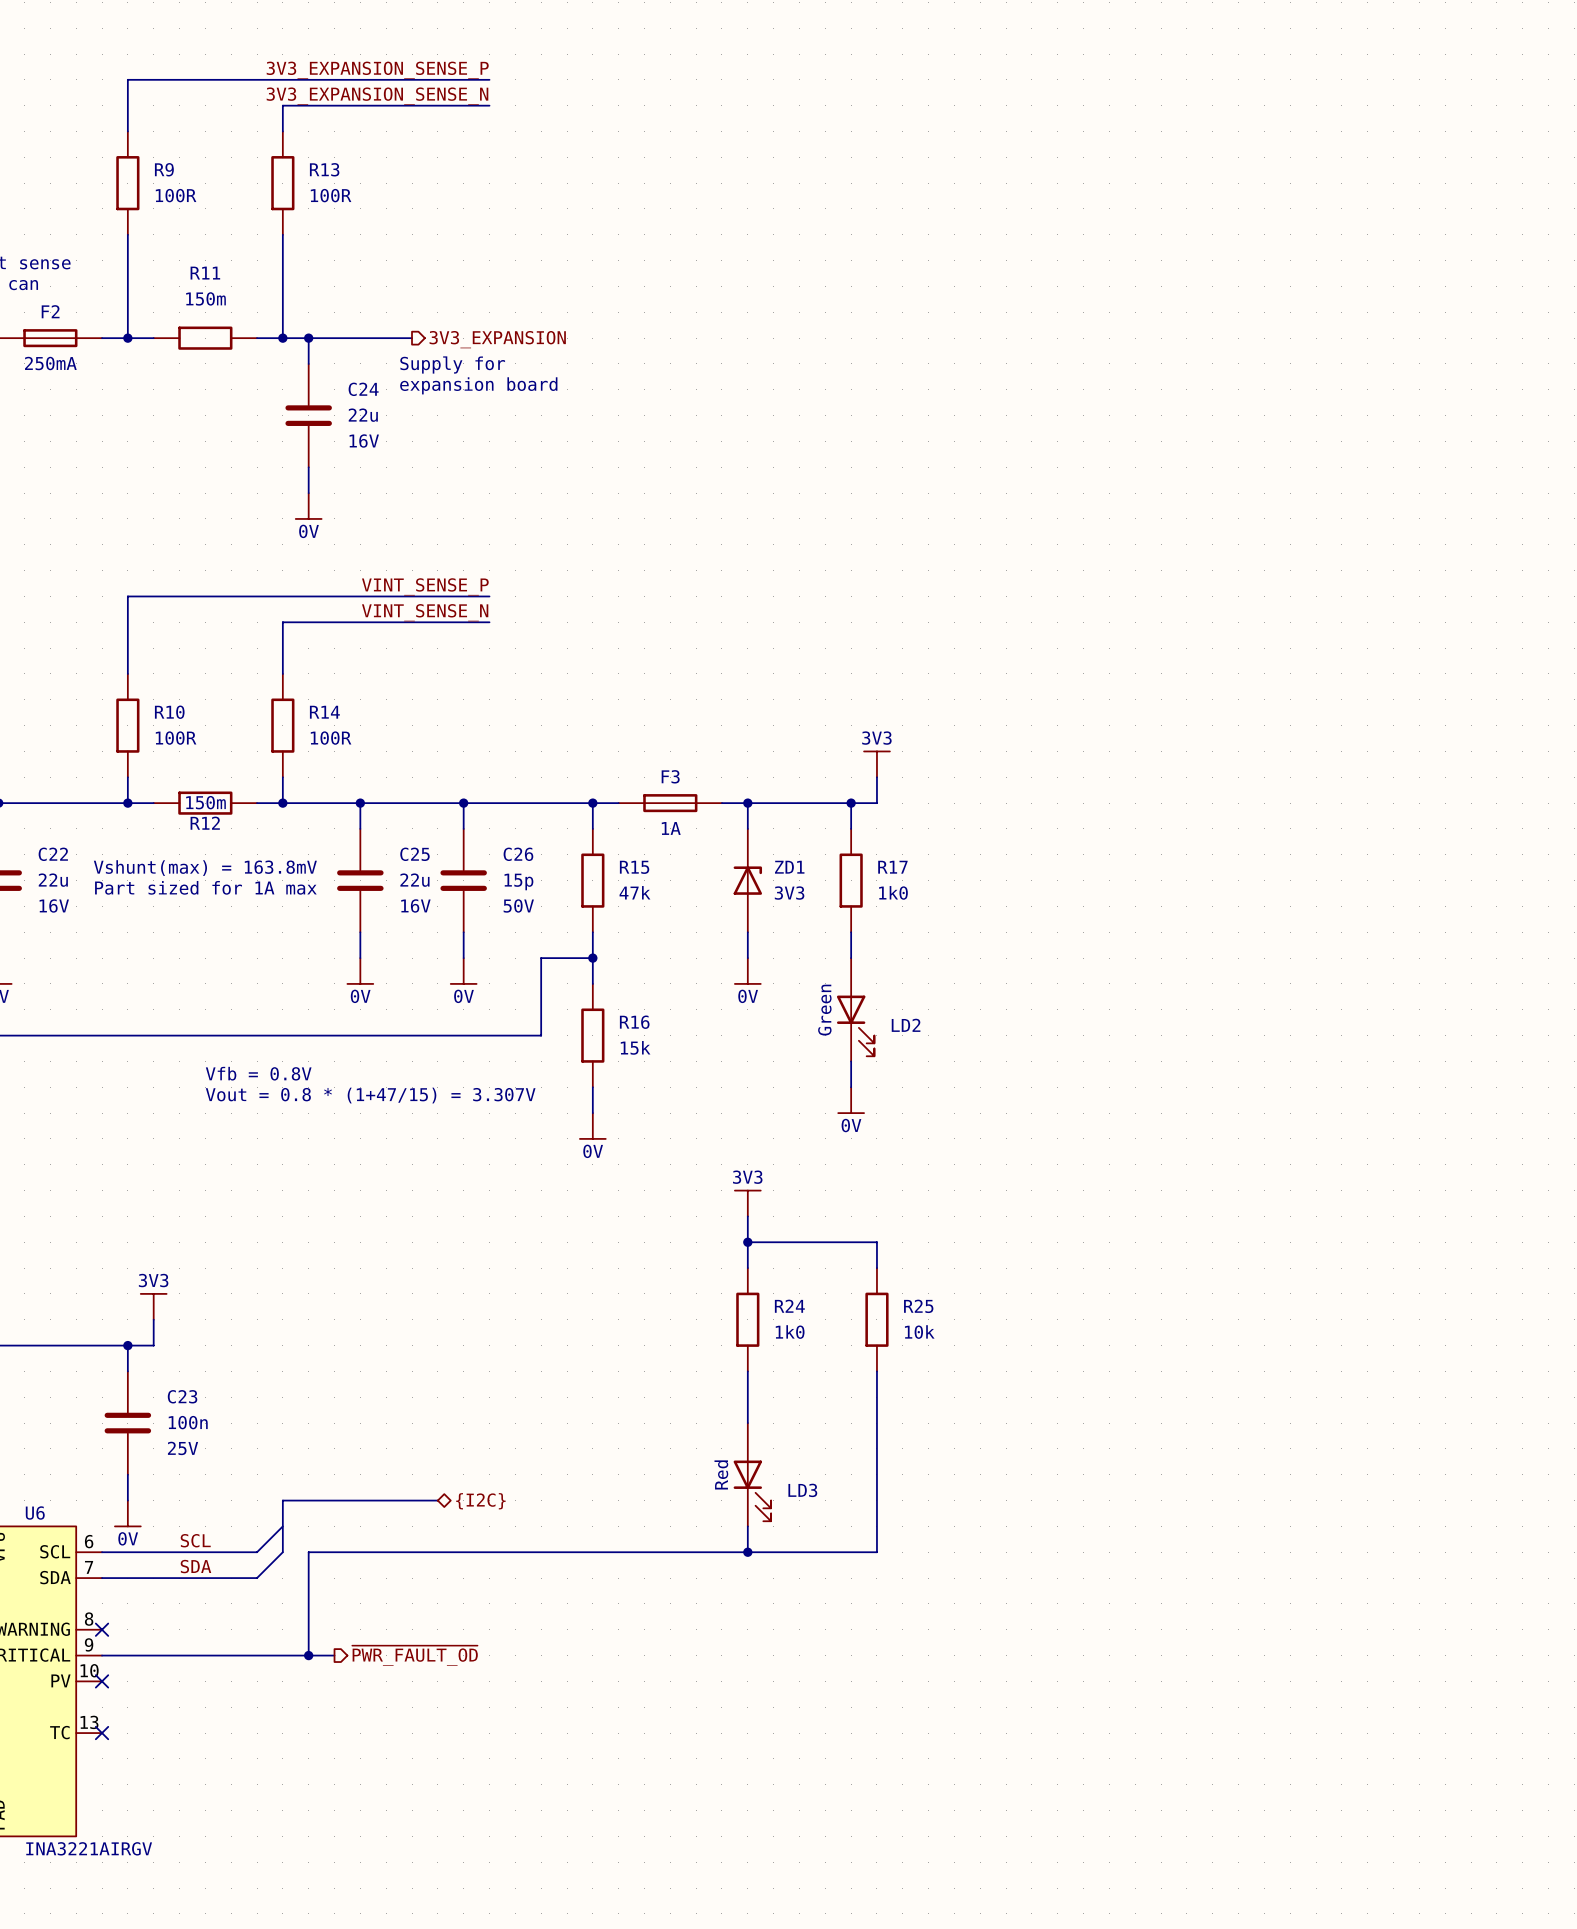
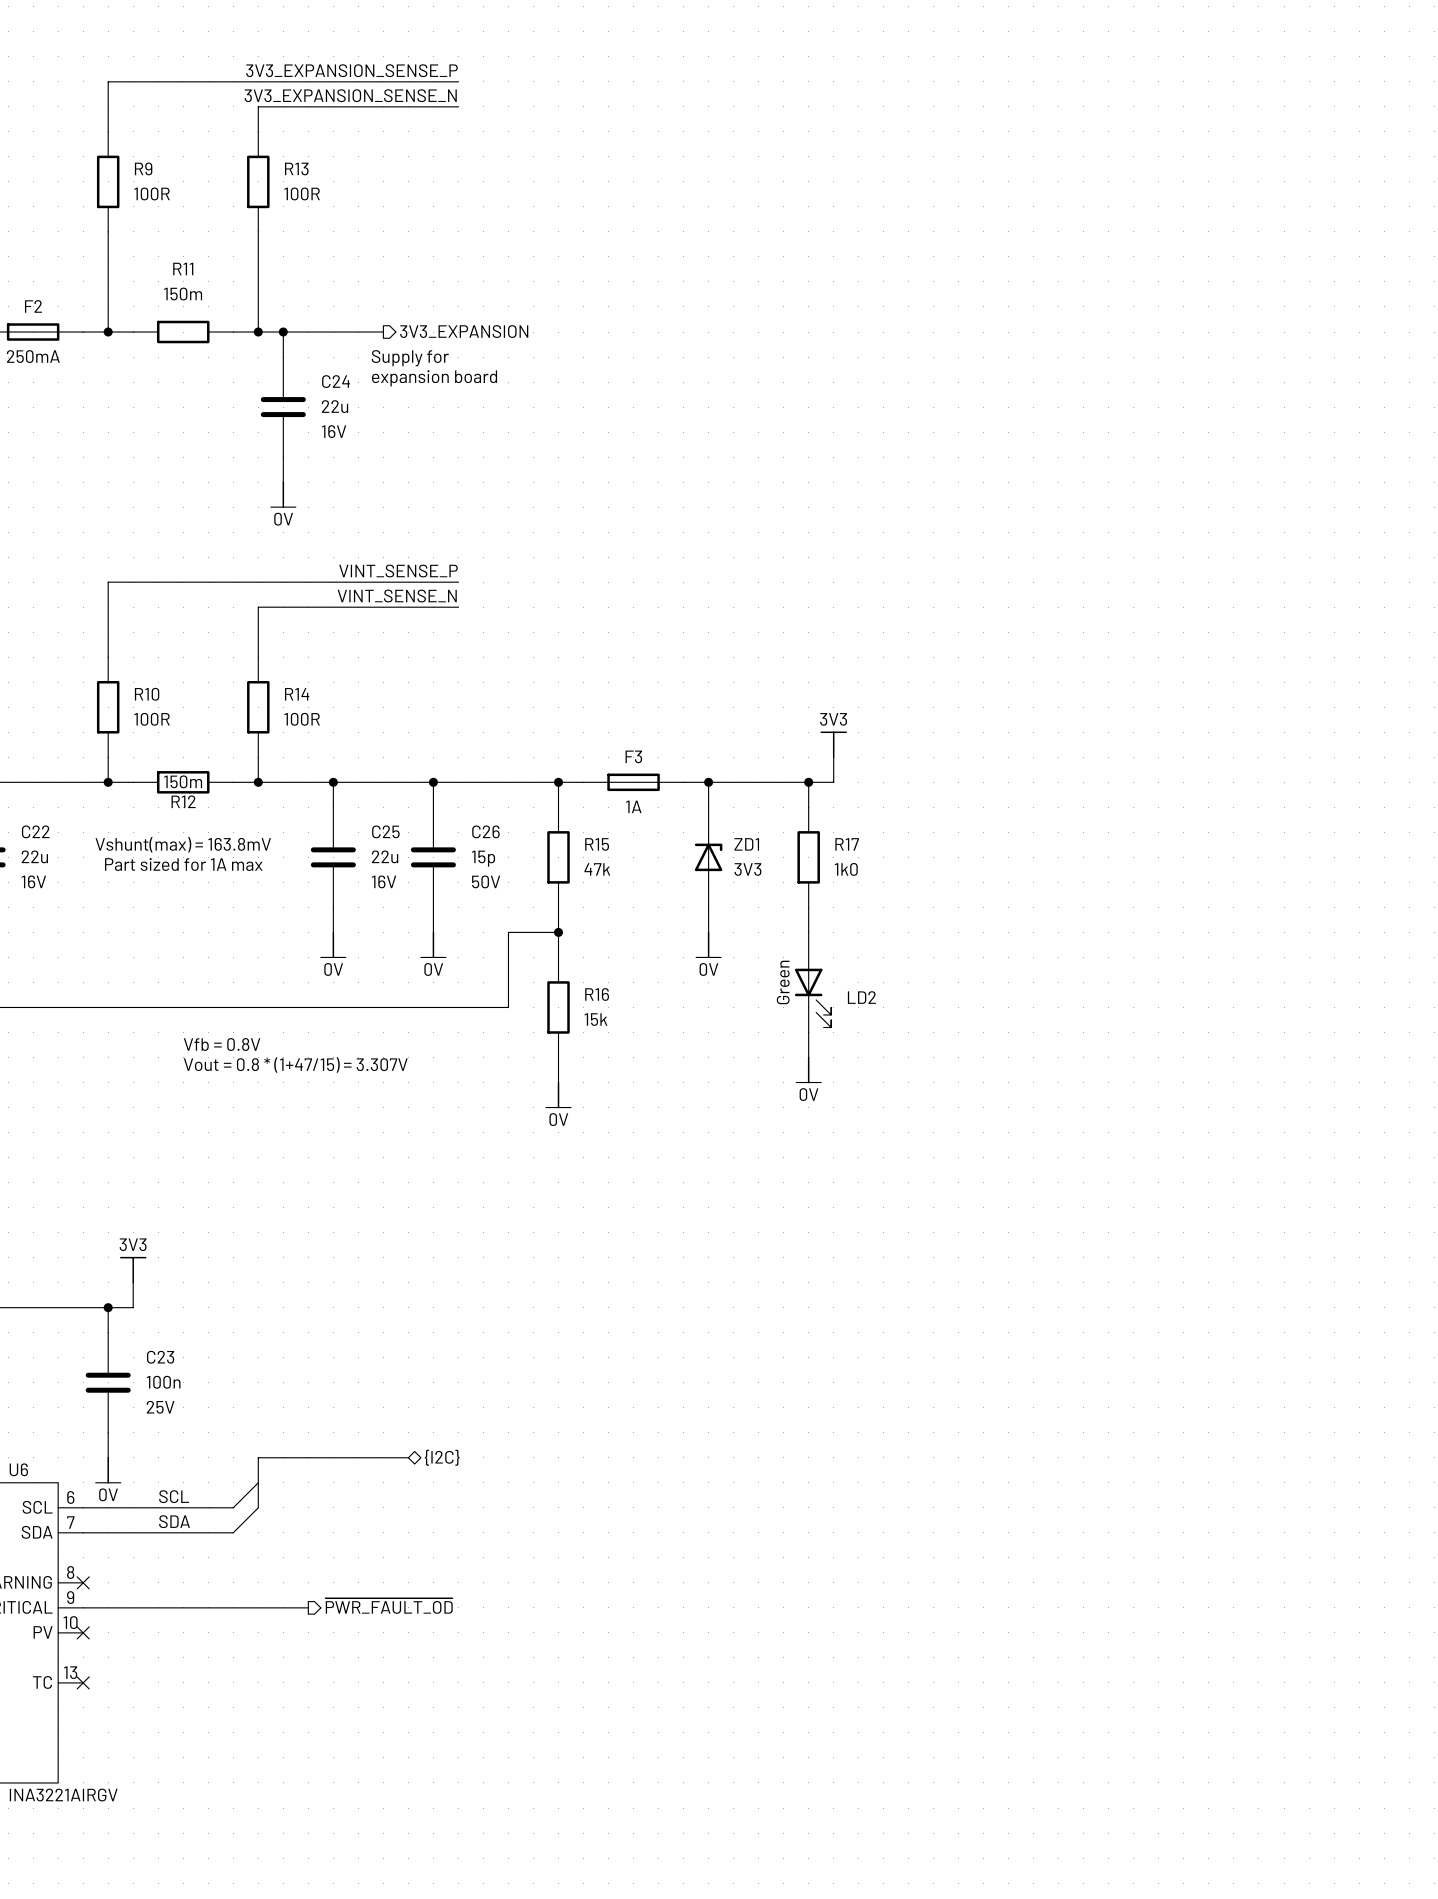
power symbol: 3V3 (747, 1203) -> none
wire: (747, 1216) (747, 1268) -> none
wire: (747, 1242) (876, 1242) (876, 1268) -> none
junction: (747, 1242) -> none
R24: 1k0 (747, 1319) -> none
R25: 10k (876, 1319) -> none
wire: (747, 1371) (747, 1423) -> none
wire: (876, 1371) (876, 1552) (308, 1552) (308, 1655) -> none
LD3: Red (752, 1474) -> none
wire: (747, 1526) (747, 1552) -> none
junction: (747, 1552) -> none
junction: (308, 1655) -> none

